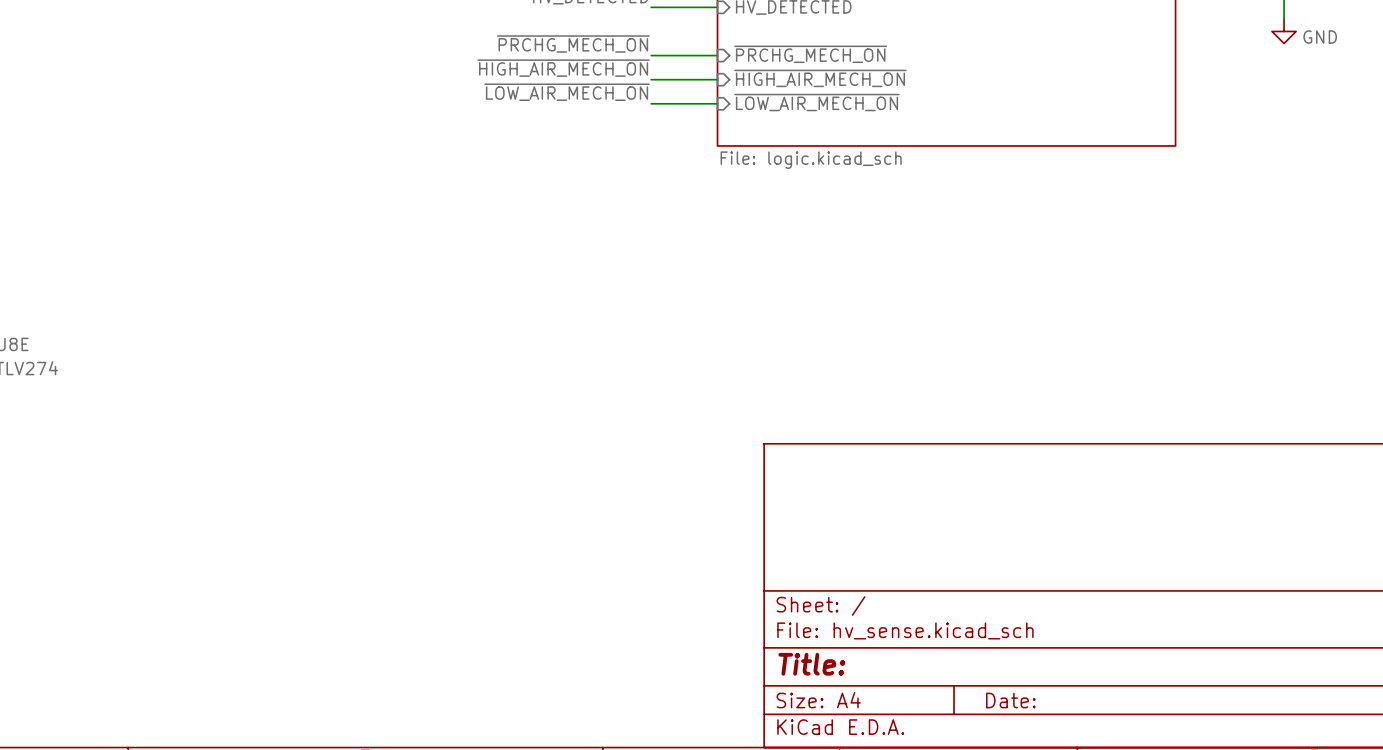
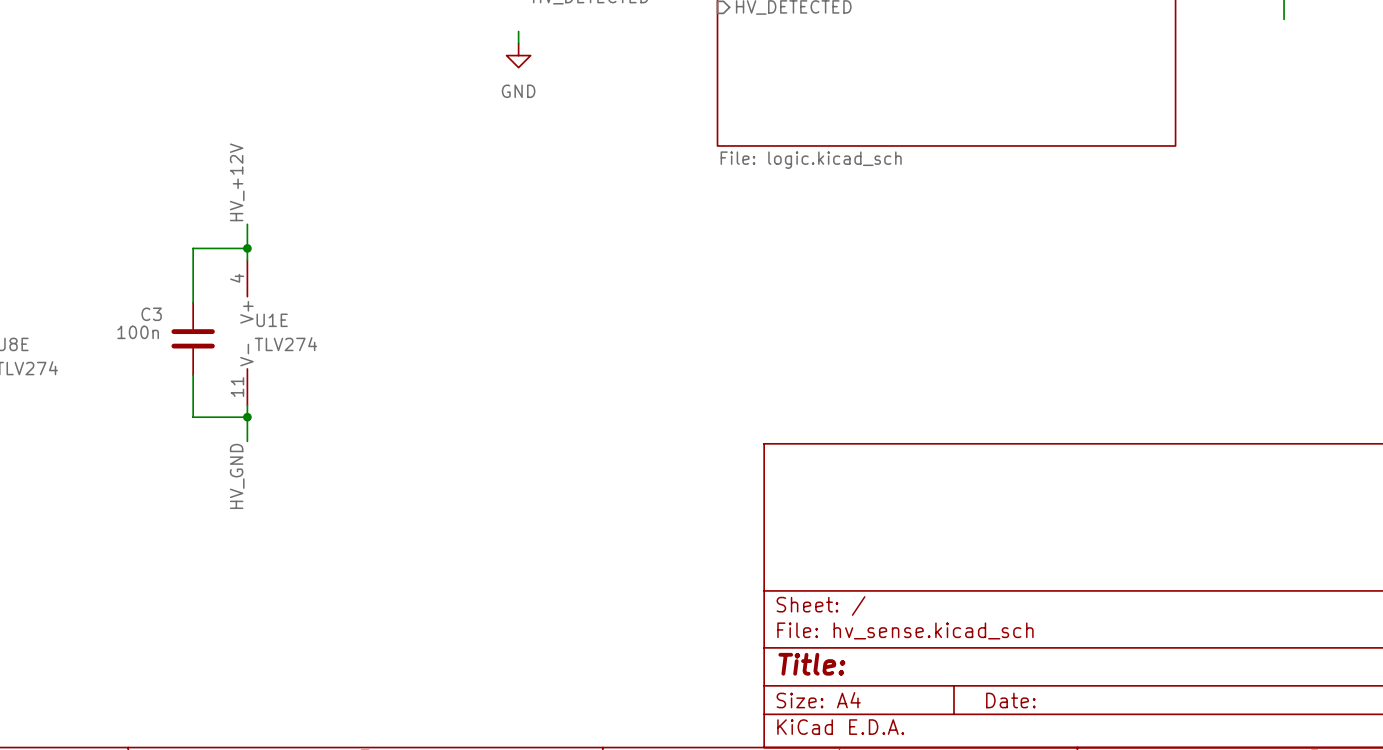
wire: (651, 7) (717, 7) -> none
wire: none -> (518, 31) (518, 43)
power symbol: GND (1284, 31) -> none
label: ~{PRCHG_MECH_ON} (573, 44) -> none
sheet pin: ~{PRCHG_MECH_ON} (810, 54) -> none
power symbol: none -> GND (518, 55)
wire: (651, 55) (717, 55) -> none
label: ~{HIGH_AIR_MECH_ON} (563, 68) -> none
sheet pin: ~{HIGH_AIR_MECH_ON} (820, 78) -> none
wire: (651, 79) (717, 79) -> none
label: ~{LOW_AIR_MECH_ON} (567, 92) -> none
sheet pin: ~{LOW_AIR_MECH_ON} (816, 102) -> none
wire: (651, 103) (717, 103) -> none
label: none -> HV_+12V (237, 182)
wire: none -> (247, 224) (247, 260)
wire: none -> (247, 248) (193, 248) (193, 302)
junction: none -> (247, 248)
U1E: none -> TLV274 (247, 332)
C3: none -> 100n (193, 338)
wire: none -> (193, 375) (193, 417) (247, 417)
wire: none -> (247, 405) (247, 441)
junction: none -> (247, 417)
label: none -> HV_GND (237, 476)

